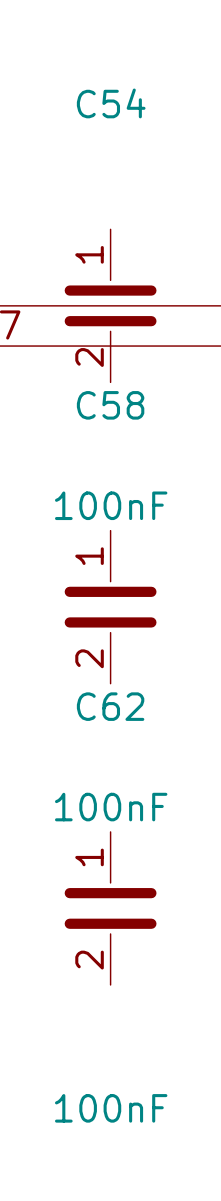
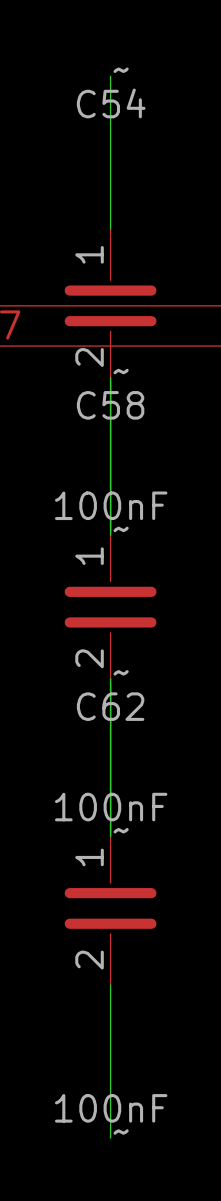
label: none -> ~ (121, 70)
wire: none -> (110, 76) (110, 229)
label: none -> ~ (121, 371)
wire: none -> (110, 377) (110, 535)
label: none -> ~ (121, 529)
label: none -> ~ (121, 672)
wire: none -> (110, 678) (110, 836)
label: none -> ~ (121, 830)
wire: none -> (110, 984) (110, 1138)
label: none -> ~ (121, 1132)

